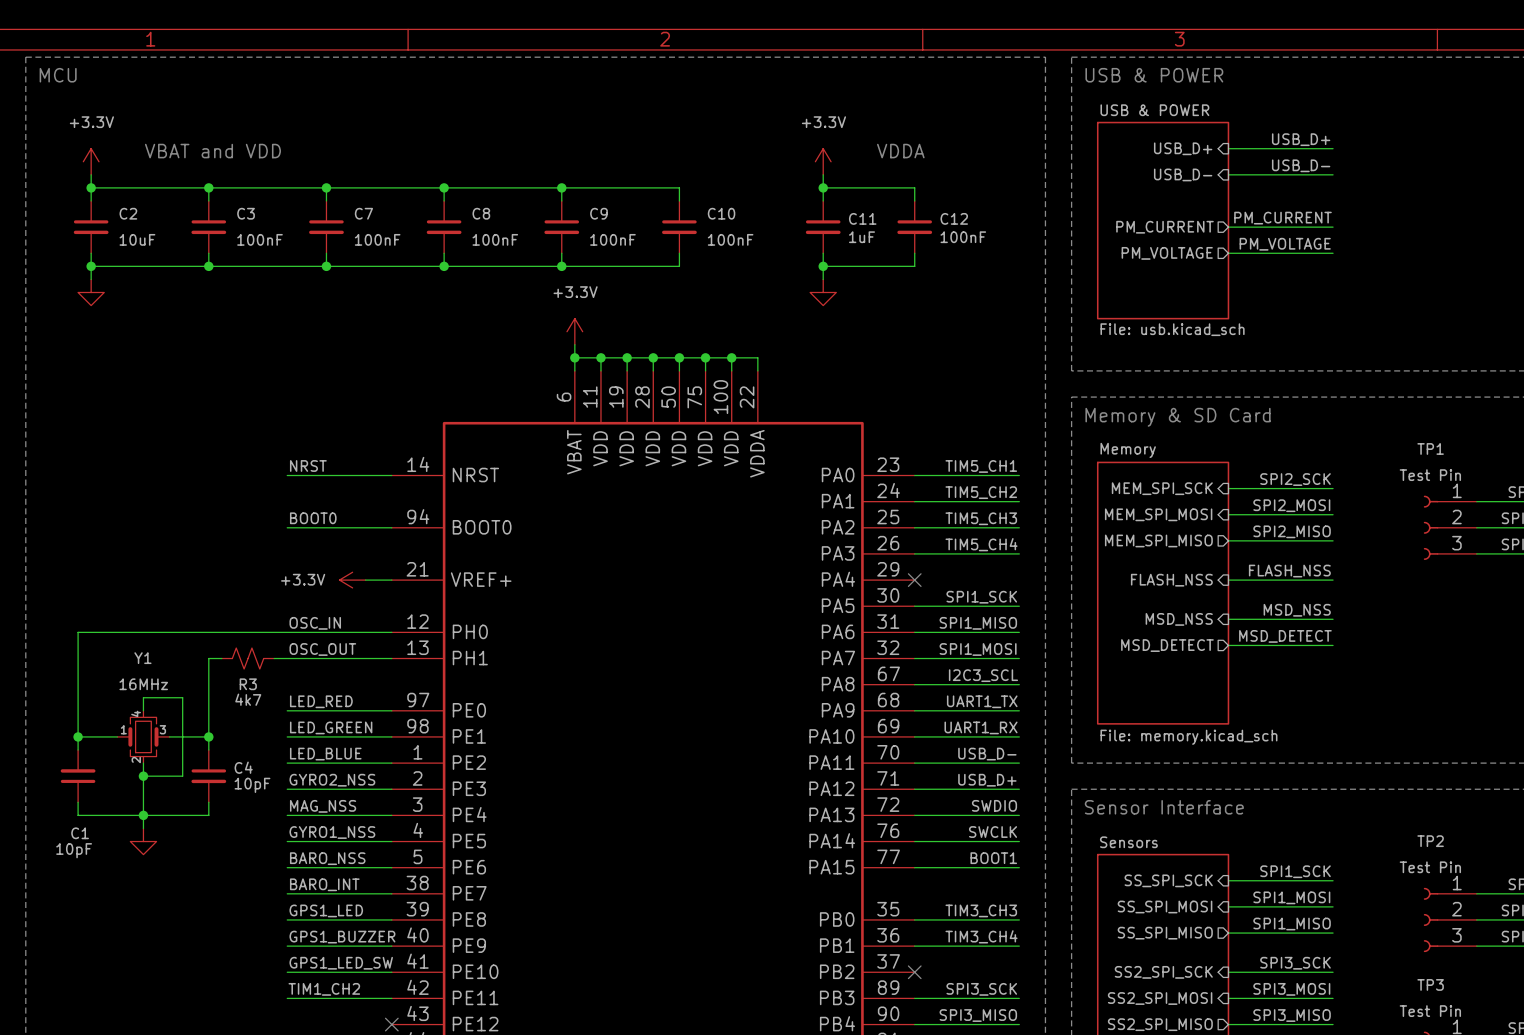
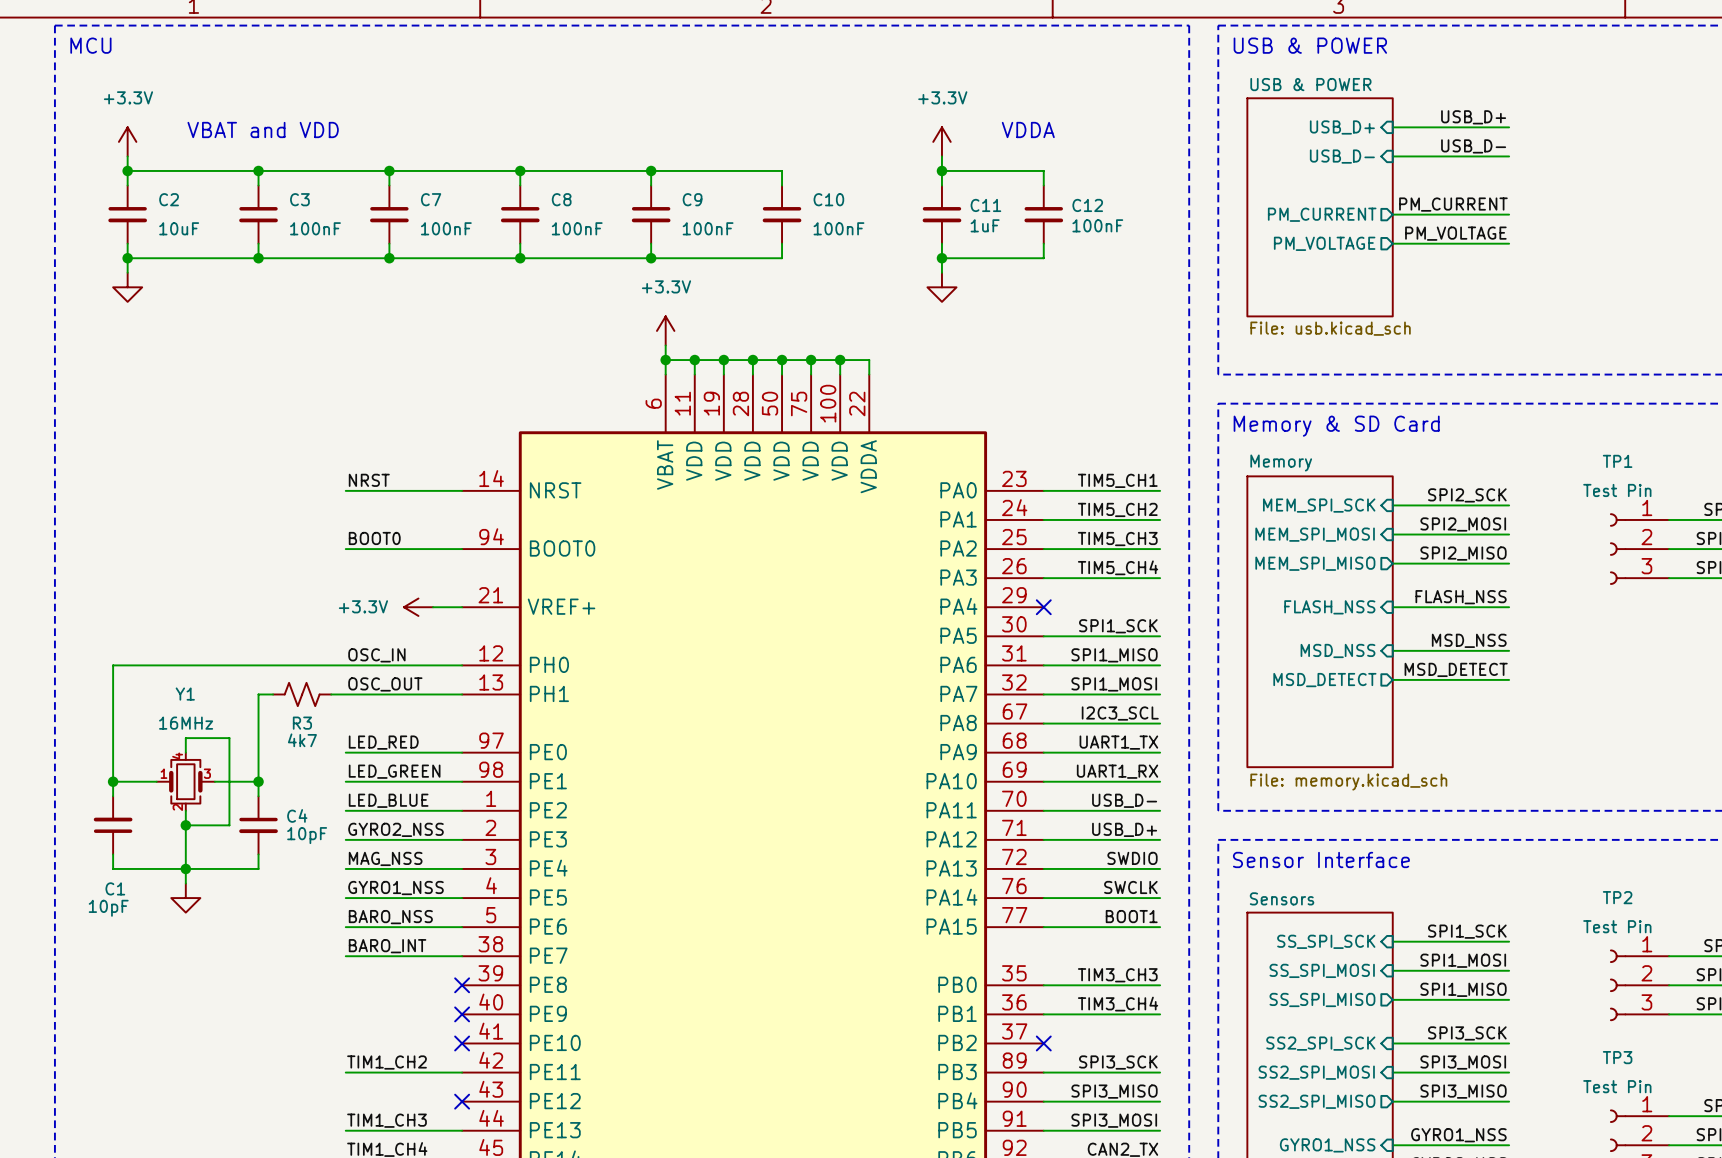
label: GPS1_LED (326, 910) -> none
wire: (287, 919) (391, 919) -> none
no-connect mark: none -> (462, 985)
label: GPS1_BUZZER (342, 937) -> none
wire: (287, 946) (391, 946) -> none
no-connect mark: none -> (462, 1014)
label: GPS1_LED_SW (341, 963) -> none
wire: (287, 972) (391, 972) -> none
no-connect mark: none -> (462, 1043)

